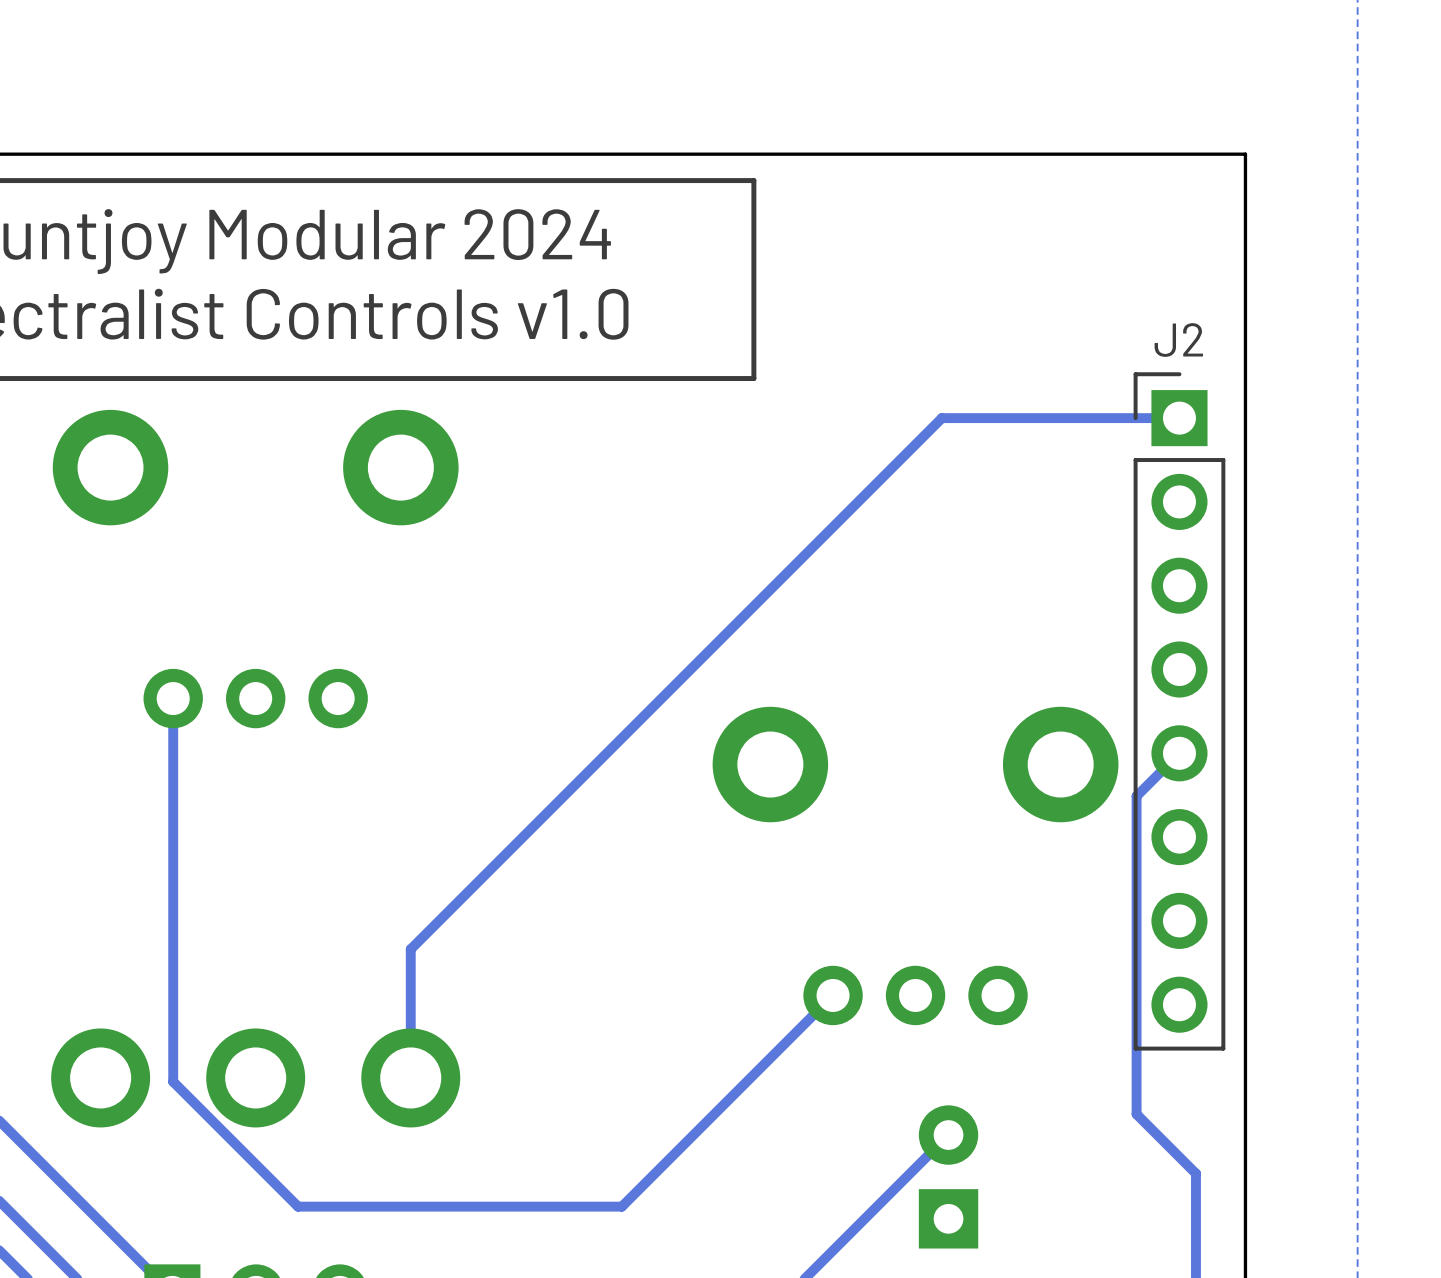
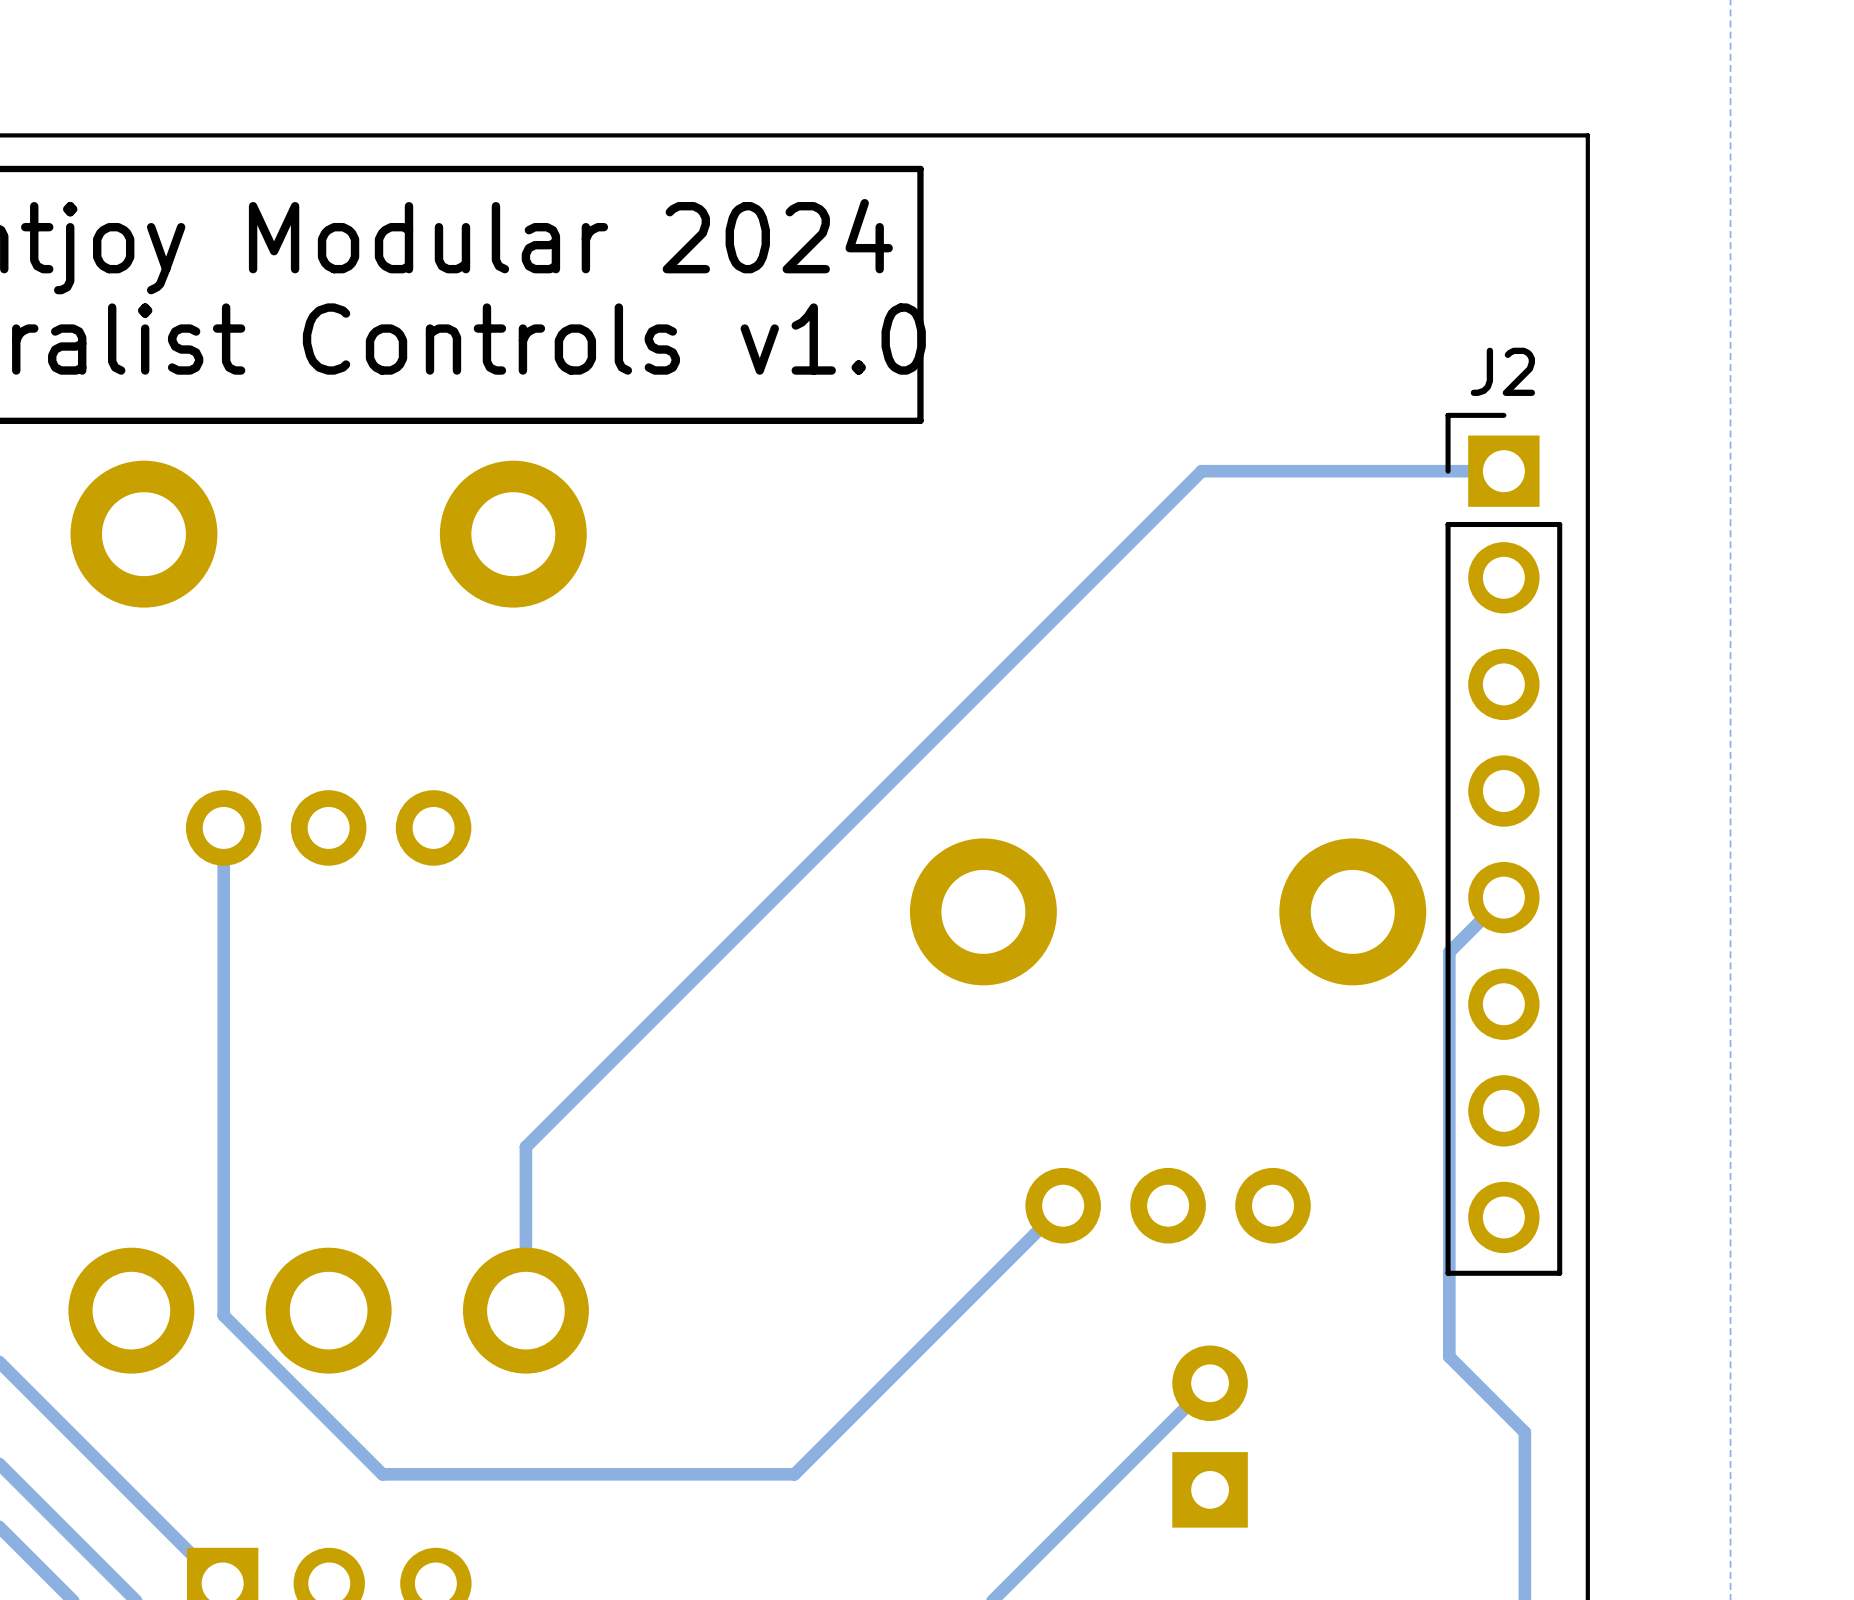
line: (720, 180) (753, 180) (753, 378) (720, 378) -> (920, 168) (920, 420)

